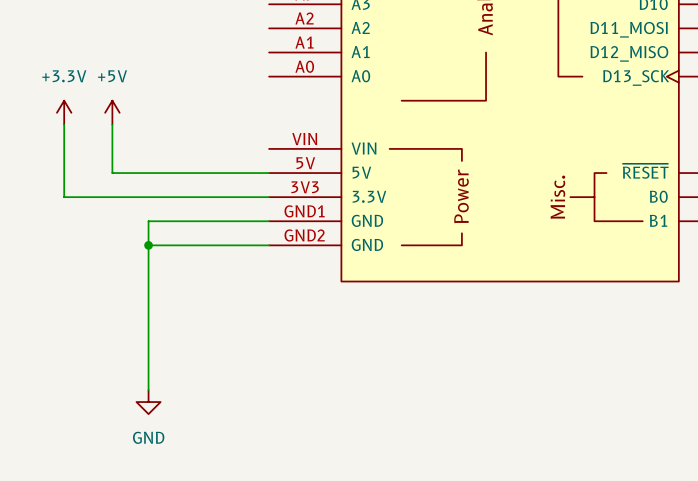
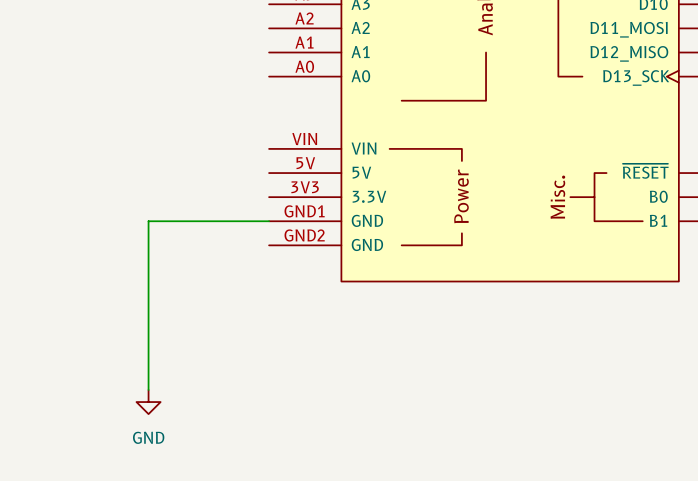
power symbol: +3.3V (64, 112) -> none
power symbol: +5V (112, 112) -> none
wire: (64, 124) (64, 197) (269, 197) -> none
wire: (112, 124) (112, 173) (269, 173) -> none
wire: (148, 245) (269, 245) -> none
junction: (148, 245) -> none

